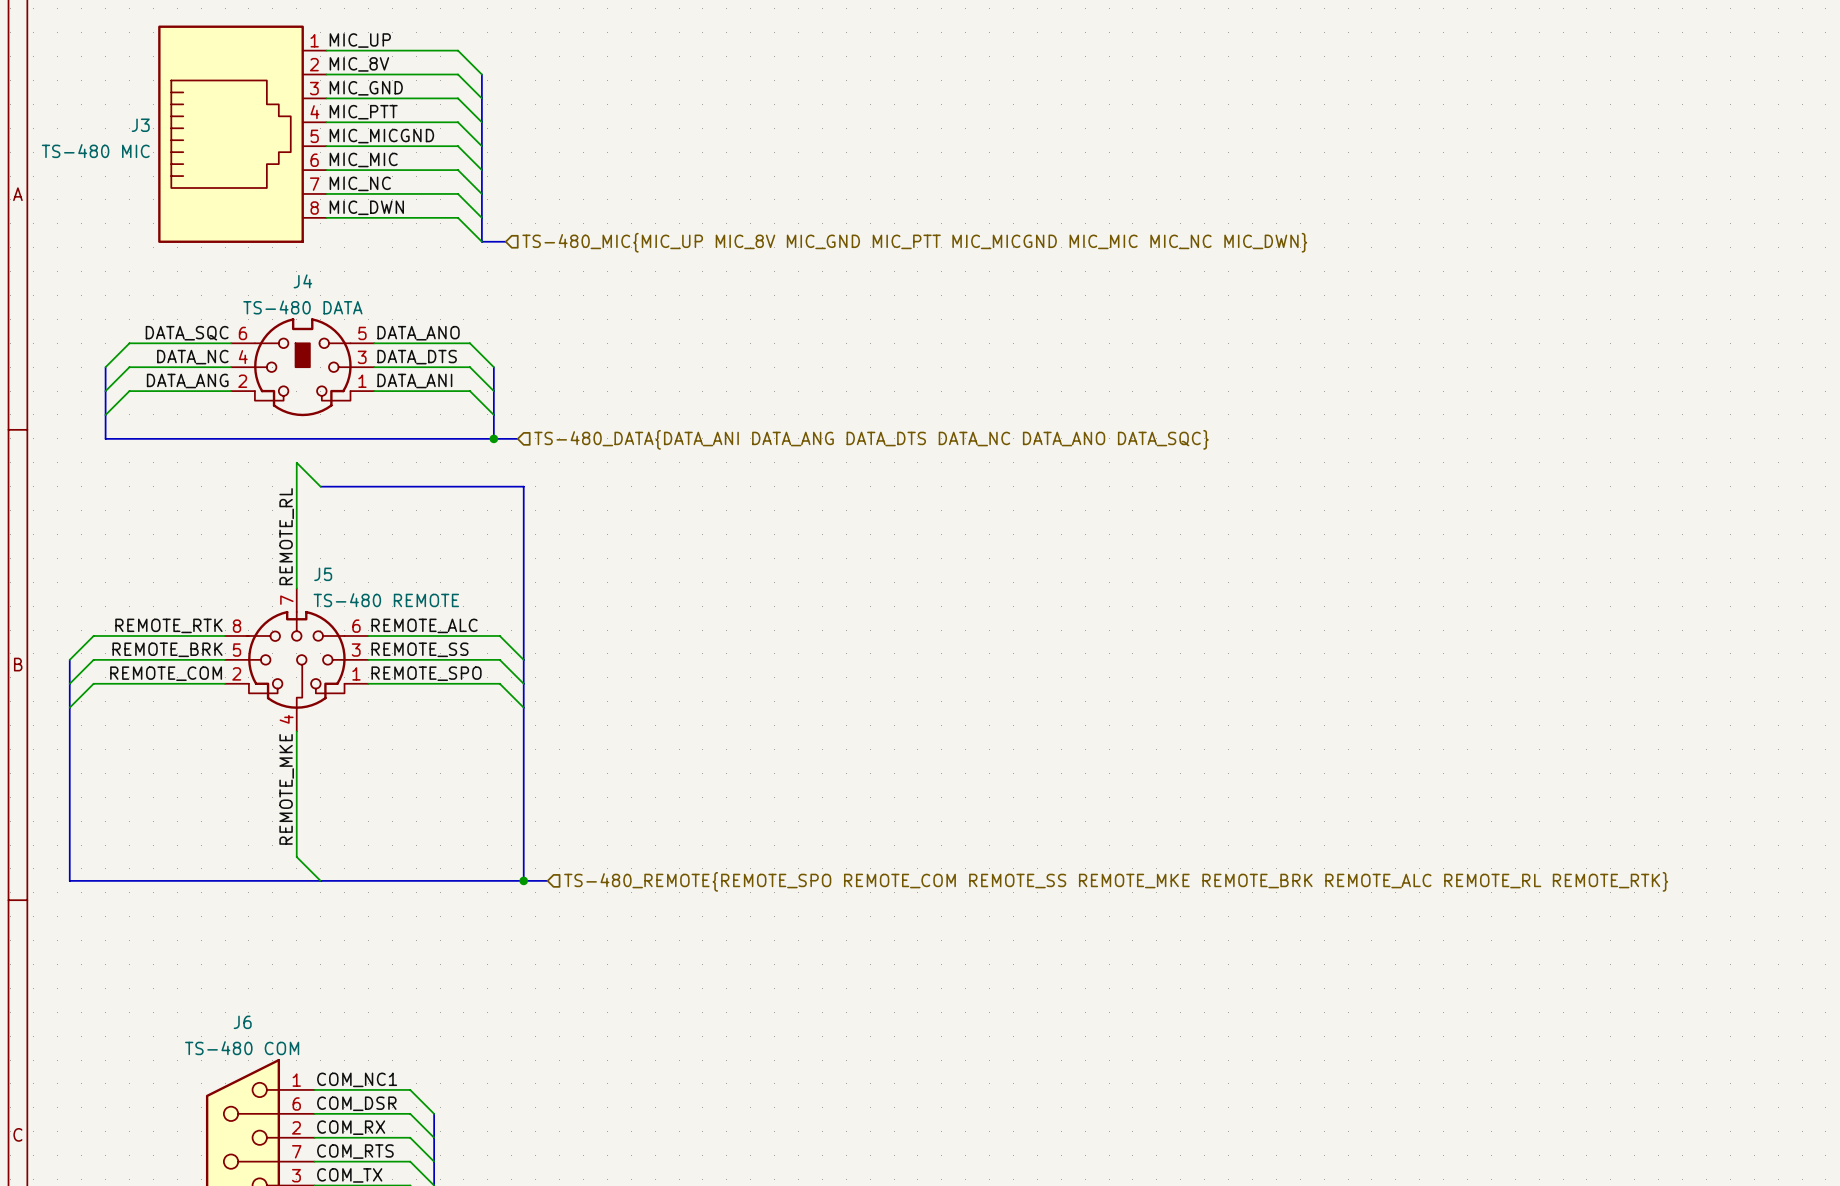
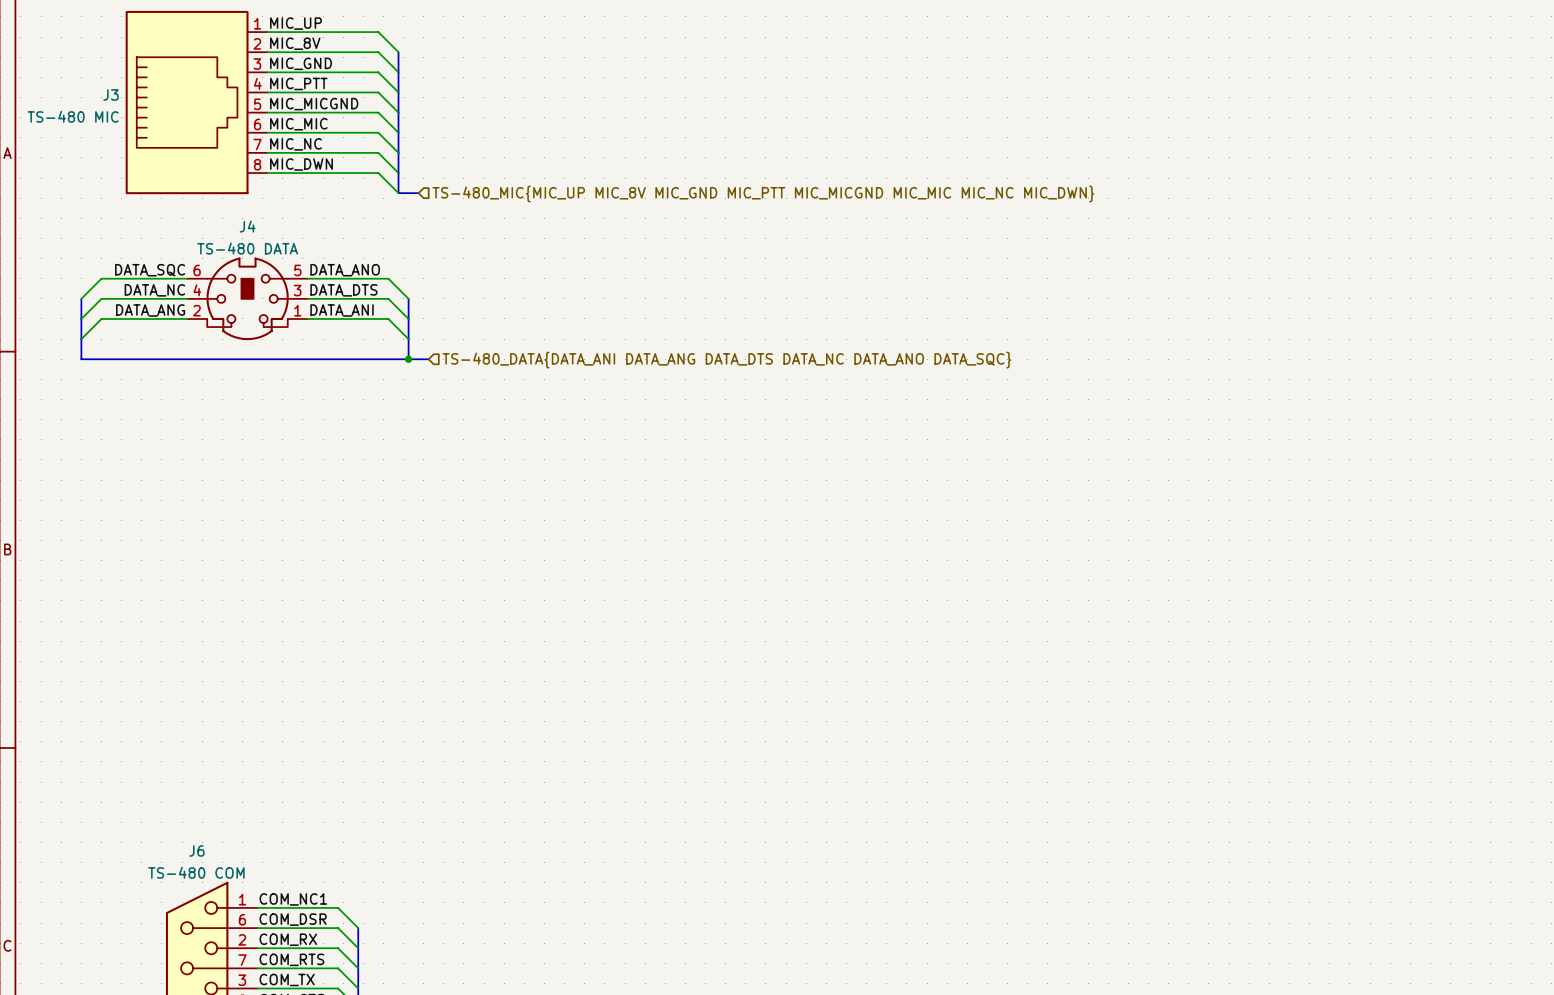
wire: (320, 486) (296, 462) (296, 588) -> none
bus: (320, 486) (523, 486) (523, 880) -> none
label: REMOTE_RL (286, 536) -> none
label: REMOTE_RTK (168, 625) -> none
label: REMOTE_ALC (424, 625) -> none
wire: (225, 635) (93, 635) (69, 659) -> none
wire: (368, 635) (499, 635) (523, 659) -> none
label: REMOTE_BRK (167, 649) -> none
label: REMOTE_SS (419, 649) -> none
bus: (69, 659) (69, 880) (547, 880) -> none
wire: (225, 659) (93, 659) (69, 683) -> none
J5: TS-480 REMOTE (296, 659) -> none
wire: (368, 659) (499, 659) (523, 683) -> none
label: REMOTE_COM (166, 673) -> none
label: REMOTE_SPO (426, 673) -> none
wire: (225, 683) (93, 683) (69, 707) -> none
wire: (368, 683) (499, 683) (523, 707) -> none
wire: (296, 731) (296, 857) (320, 880) -> none
label: REMOTE_MKE (286, 789) -> none
junction: (523, 880) -> none
hierarchical label: TS-480_REMOTE{REMOTE_SPO REMOTE_COM REMOTE_SS REMOTE_MKE REMOTE_BRK REMOTE_ALC REMOTE_RL REMOTE_RTK} (1116, 881) -> none

